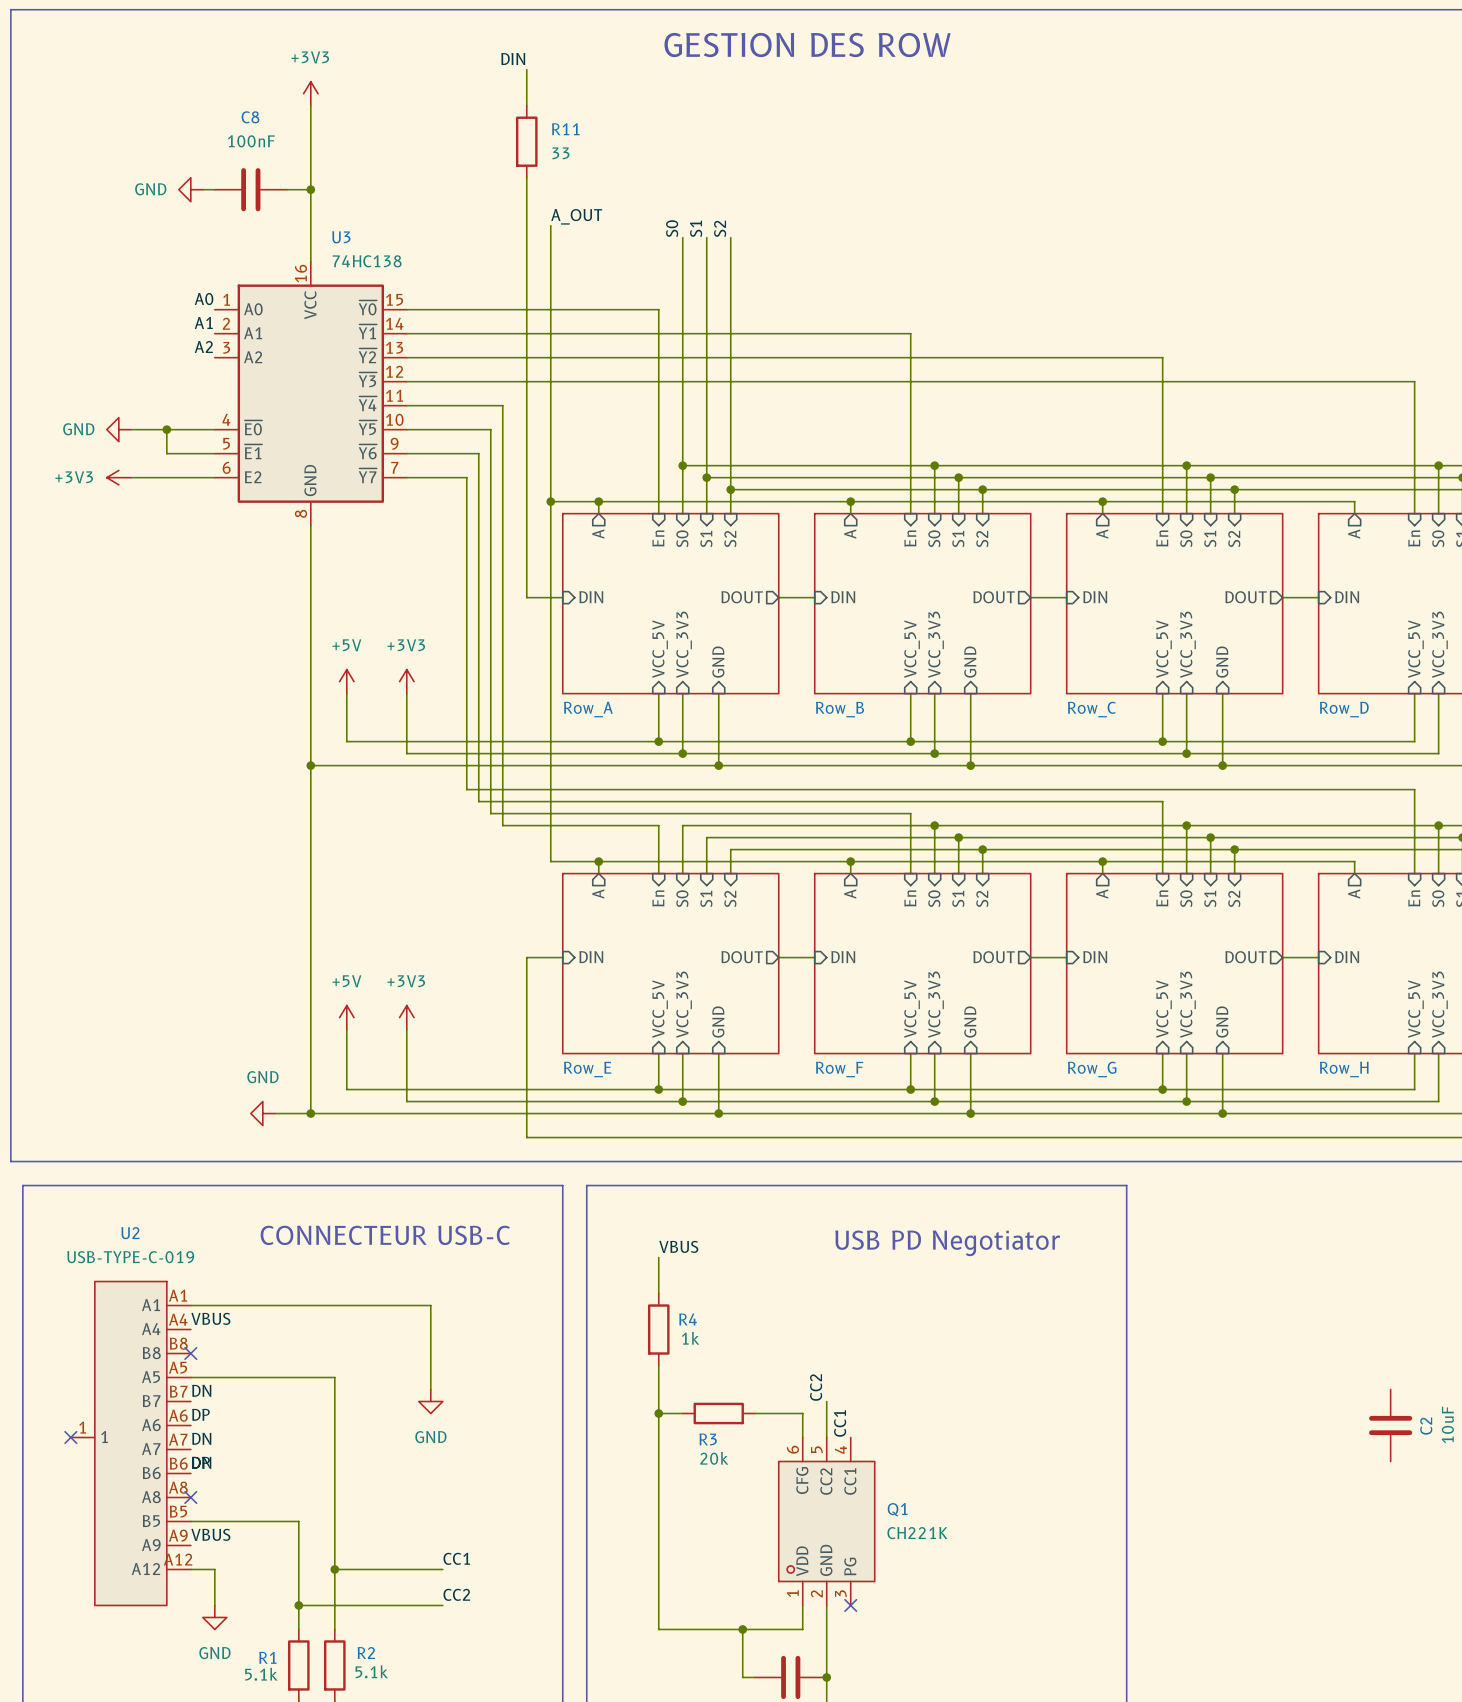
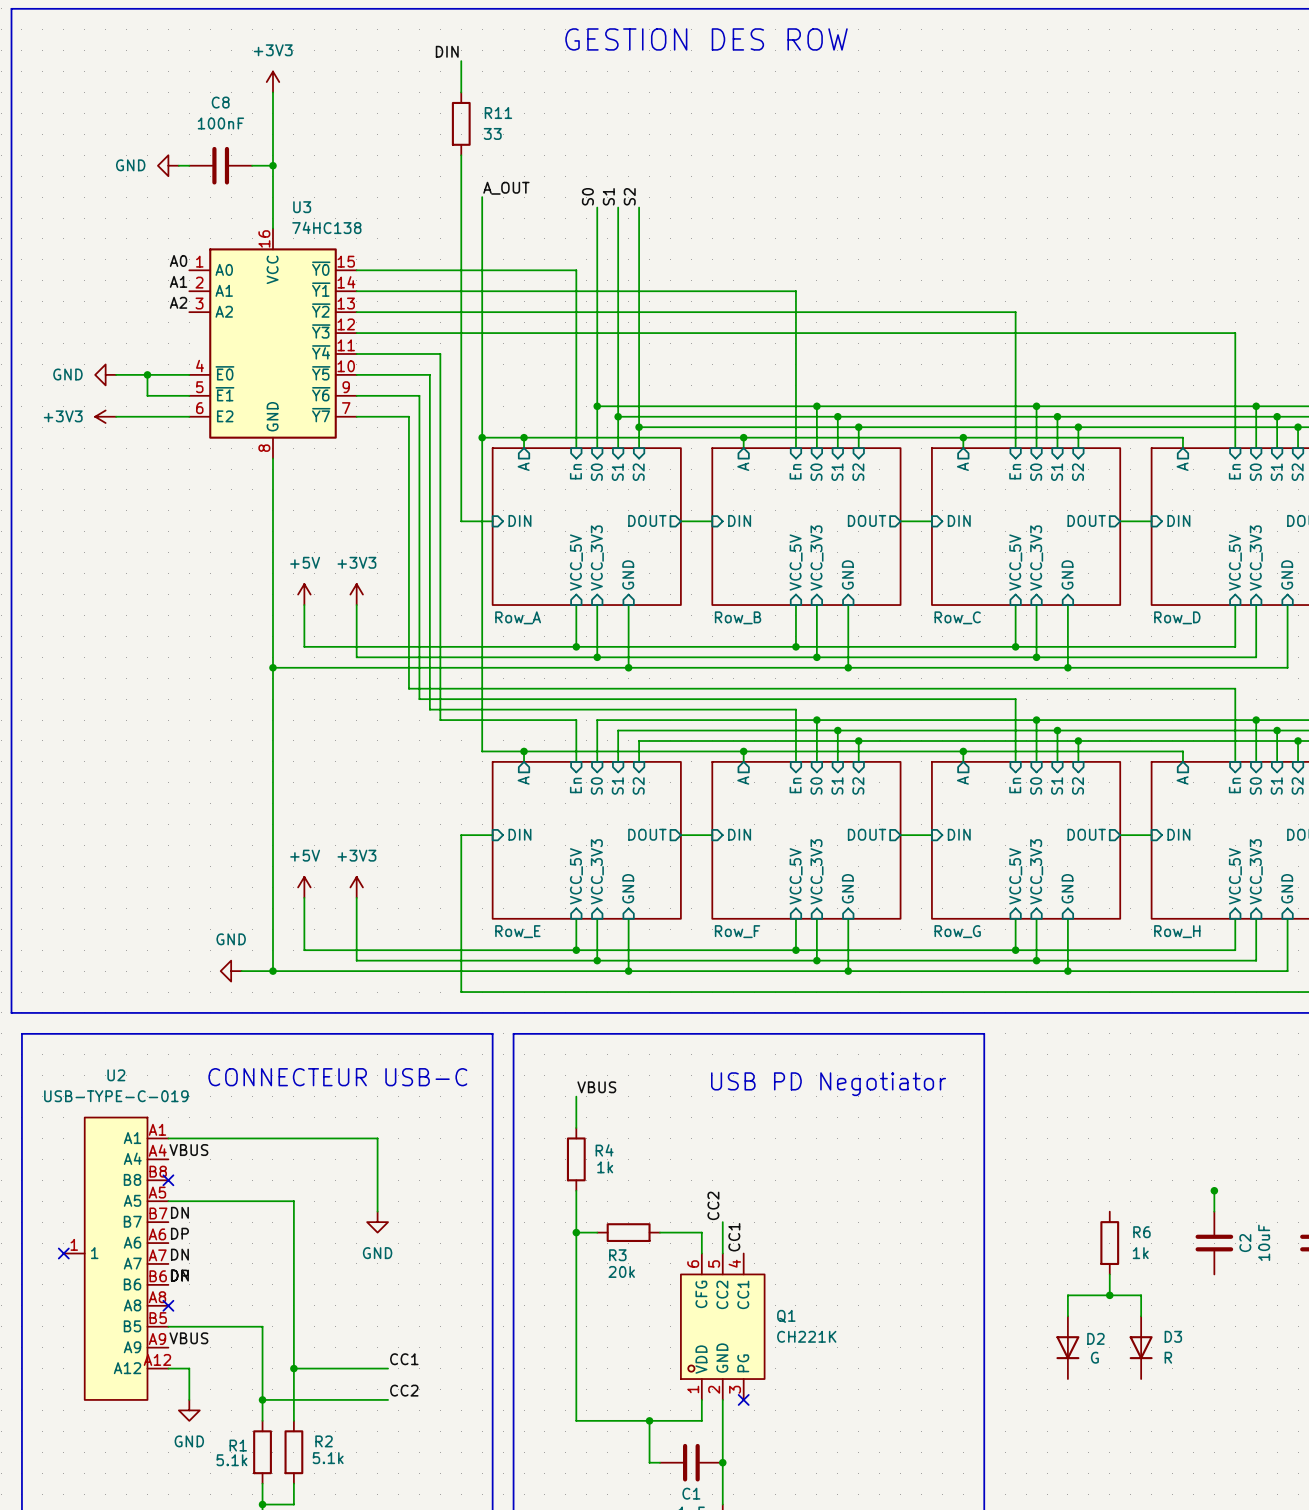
wire: none -> (1214, 1190) (1214, 1211)
junction: none -> (1214, 1190)
R6: none -> 1k (1109, 1243)
wire: none -> (1109, 1274) (1109, 1295)
junction: none -> (1109, 1295)
wire: none -> (1067, 1316) (1067, 1295) (1141, 1295) (1141, 1316)
D2: none -> G (1067, 1347)
D3: none -> R (1141, 1347)

